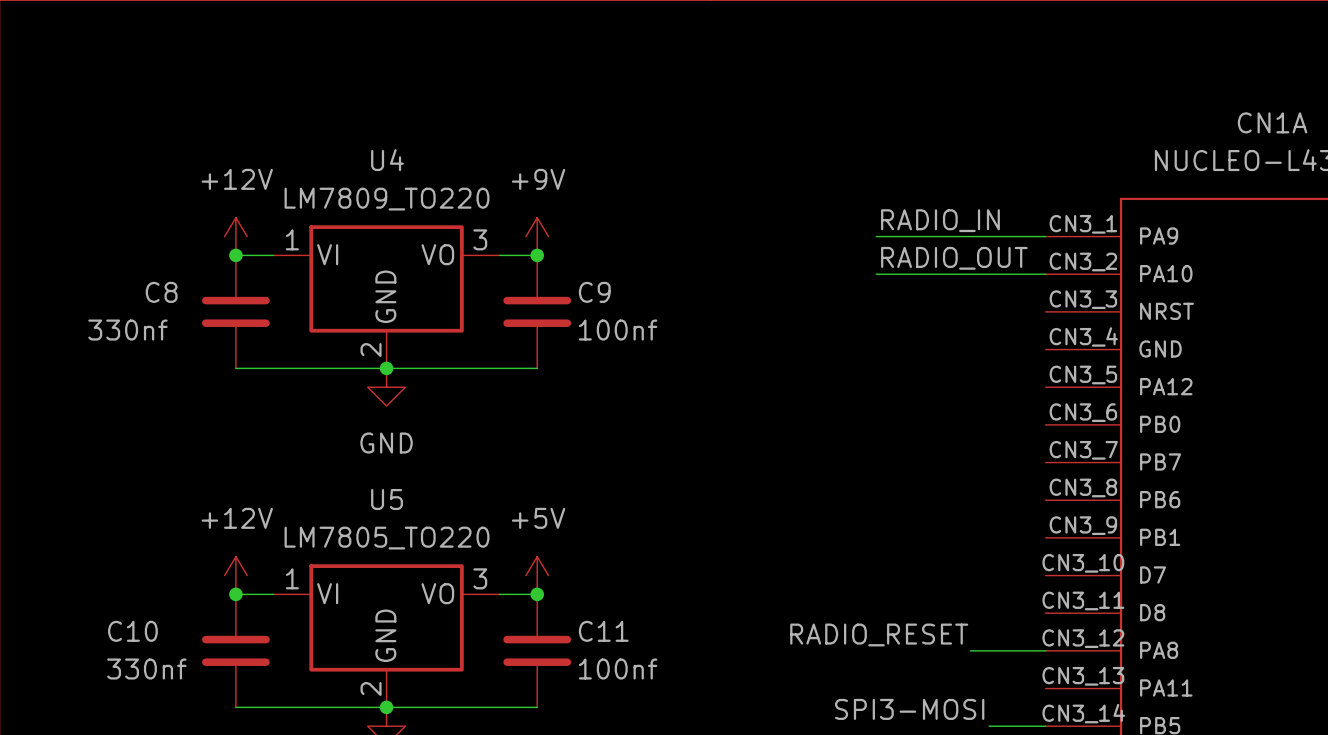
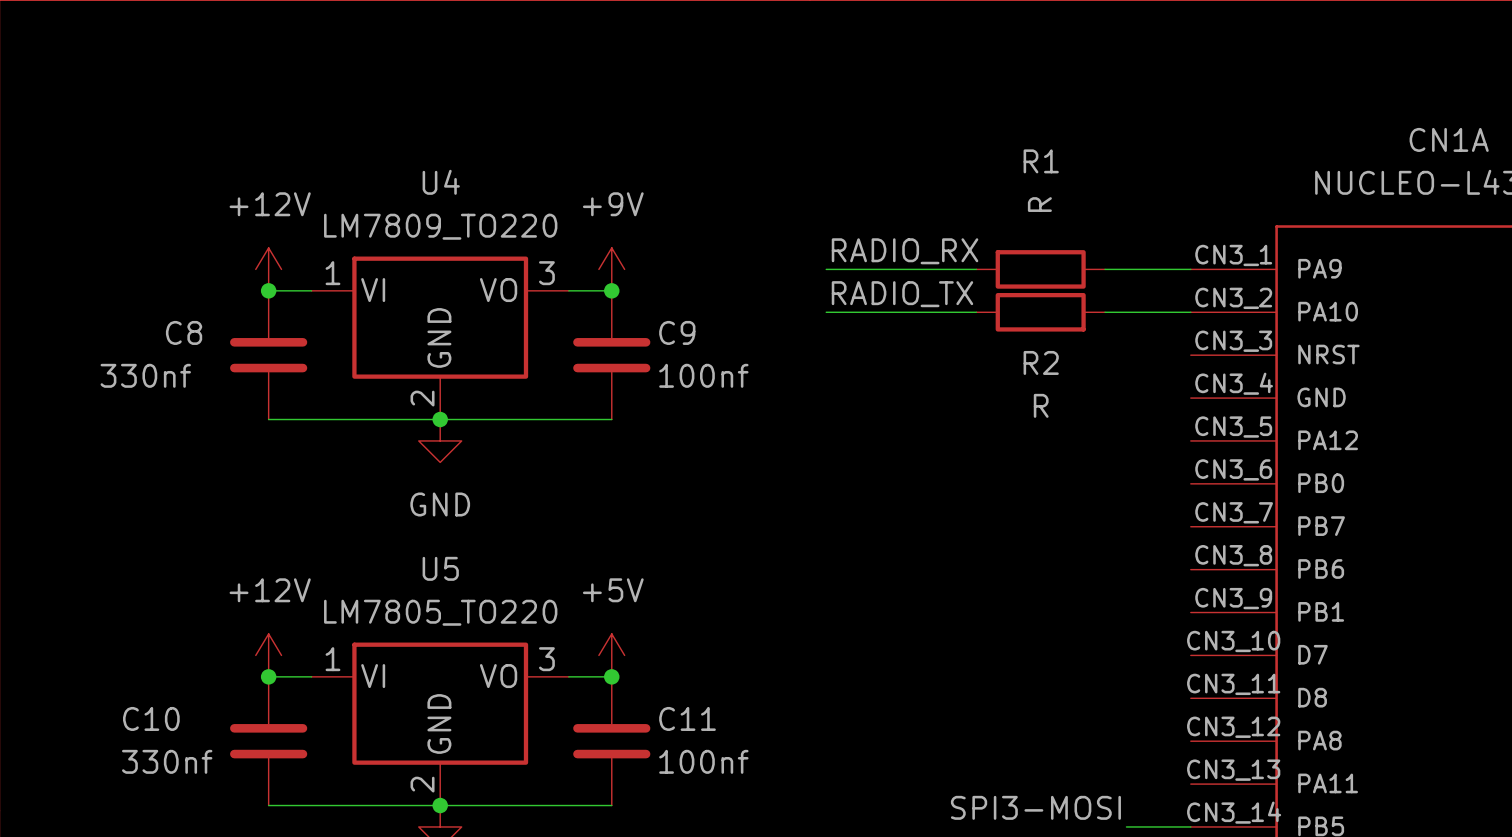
label: none -> RADIO_RX (905, 251)
label: RADIO_IN (940, 220) -> none
wire: none -> (826, 269) (976, 269)
wire: (876, 236) (970, 236) -> none
R1: none -> R (1040, 269)
label: none -> RADIO_TX (902, 294)
label: RADIO_OUT (954, 258) -> none
wire: none -> (826, 312) (976, 312)
wire: (876, 274) (970, 274) -> none
R2: none -> R (1040, 312)
label: RADIO_RESET (879, 634) -> none
wire: (970, 650) (1045, 650) -> none

